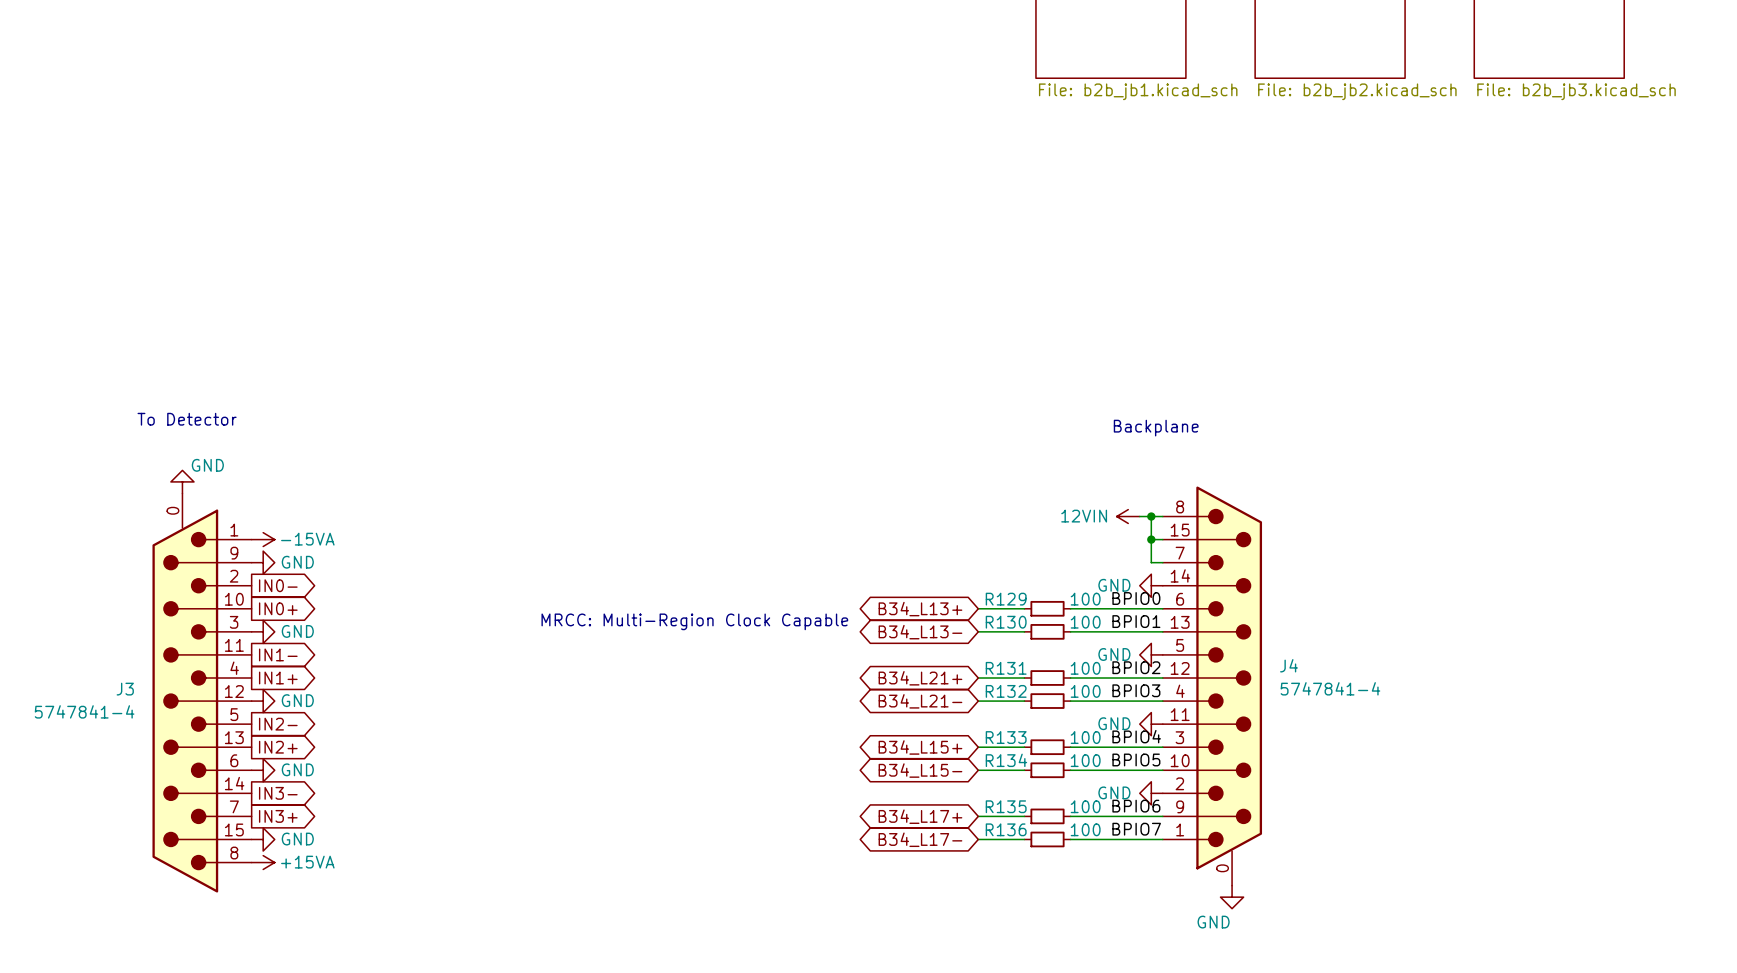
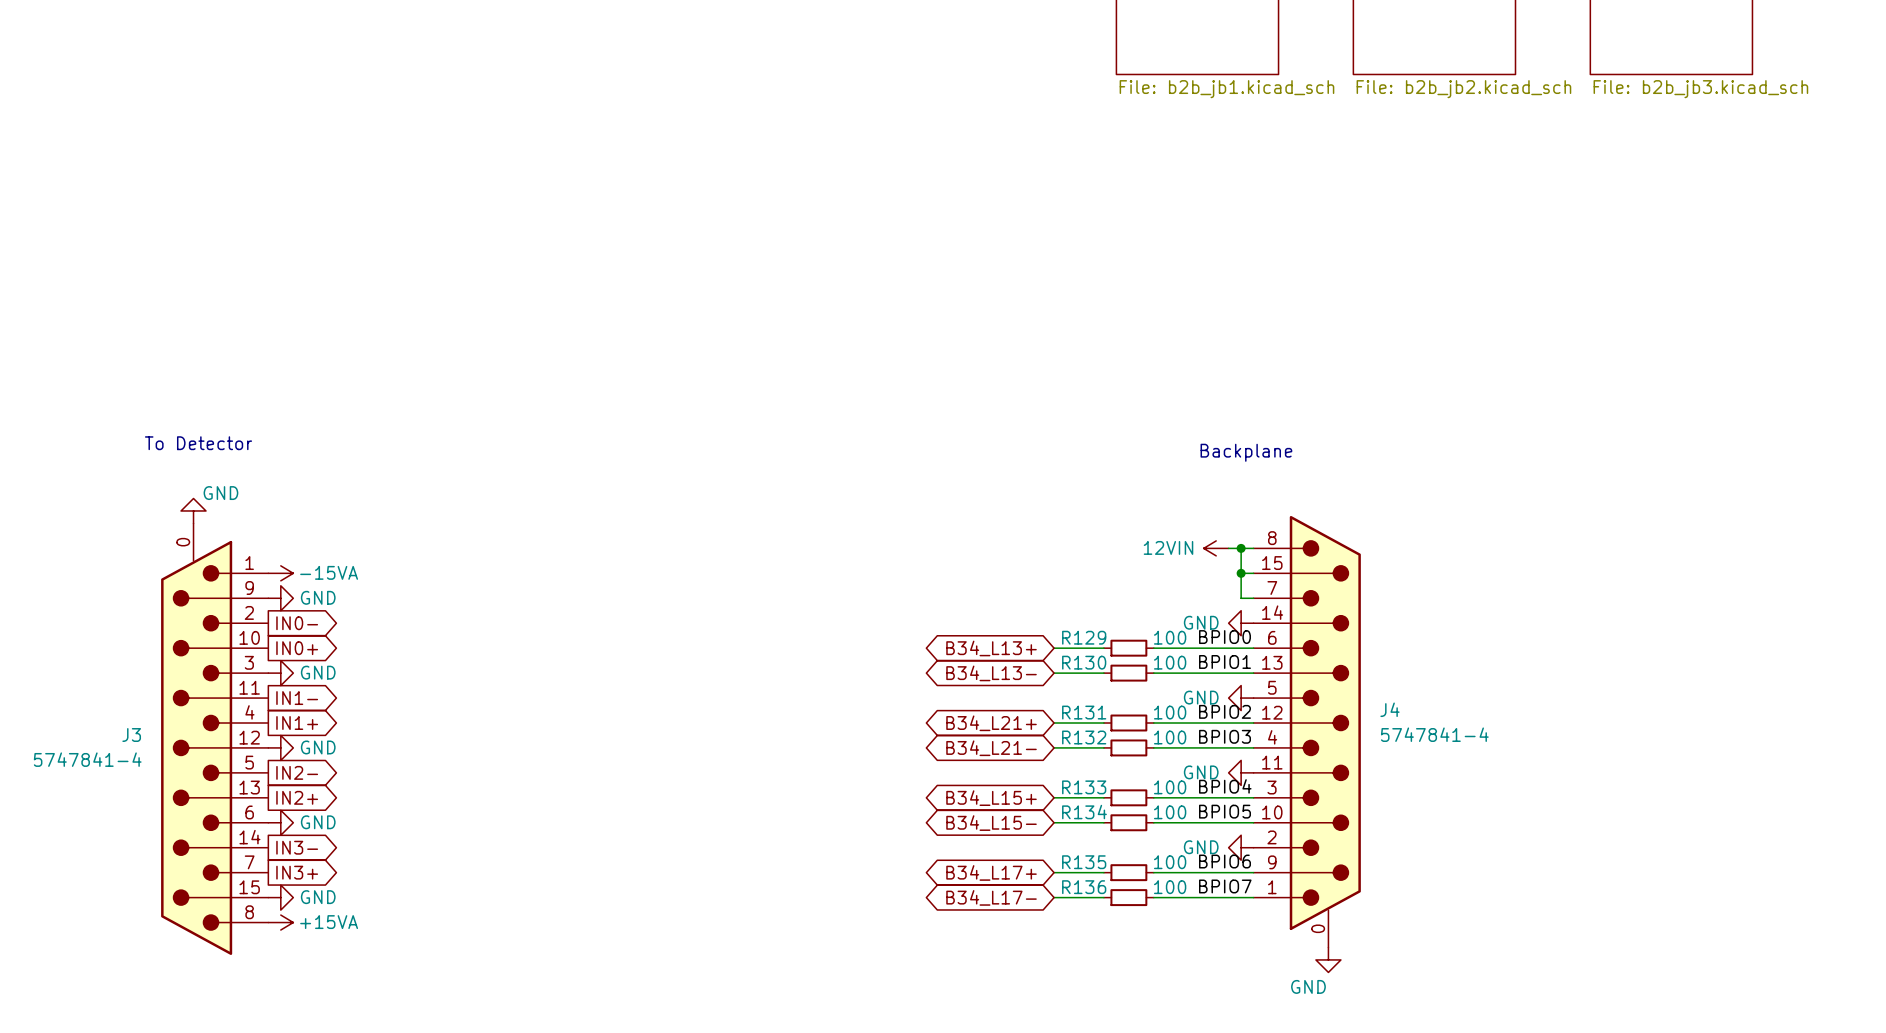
text: MRCC: Multi-Region Clock Capable (694, 621) -> none

